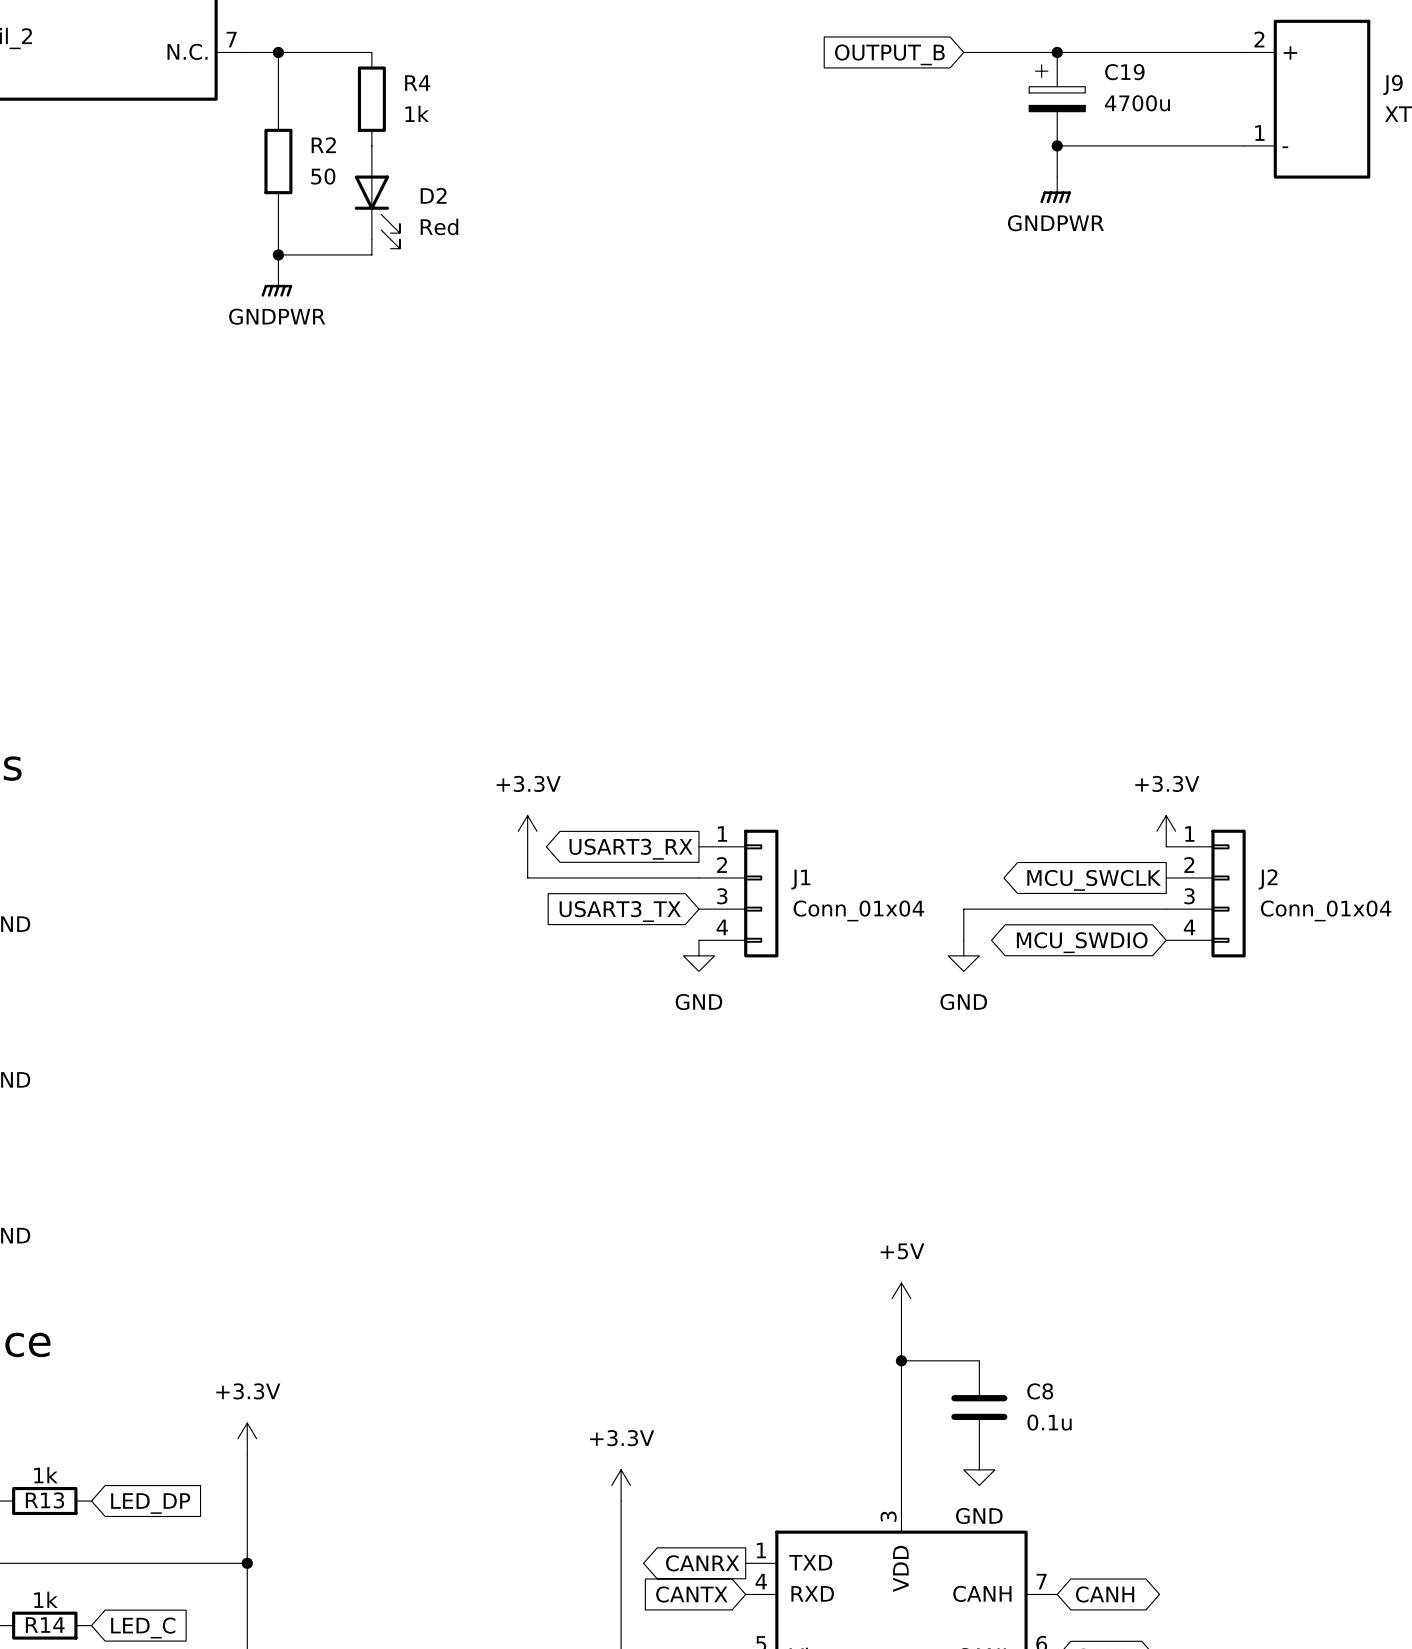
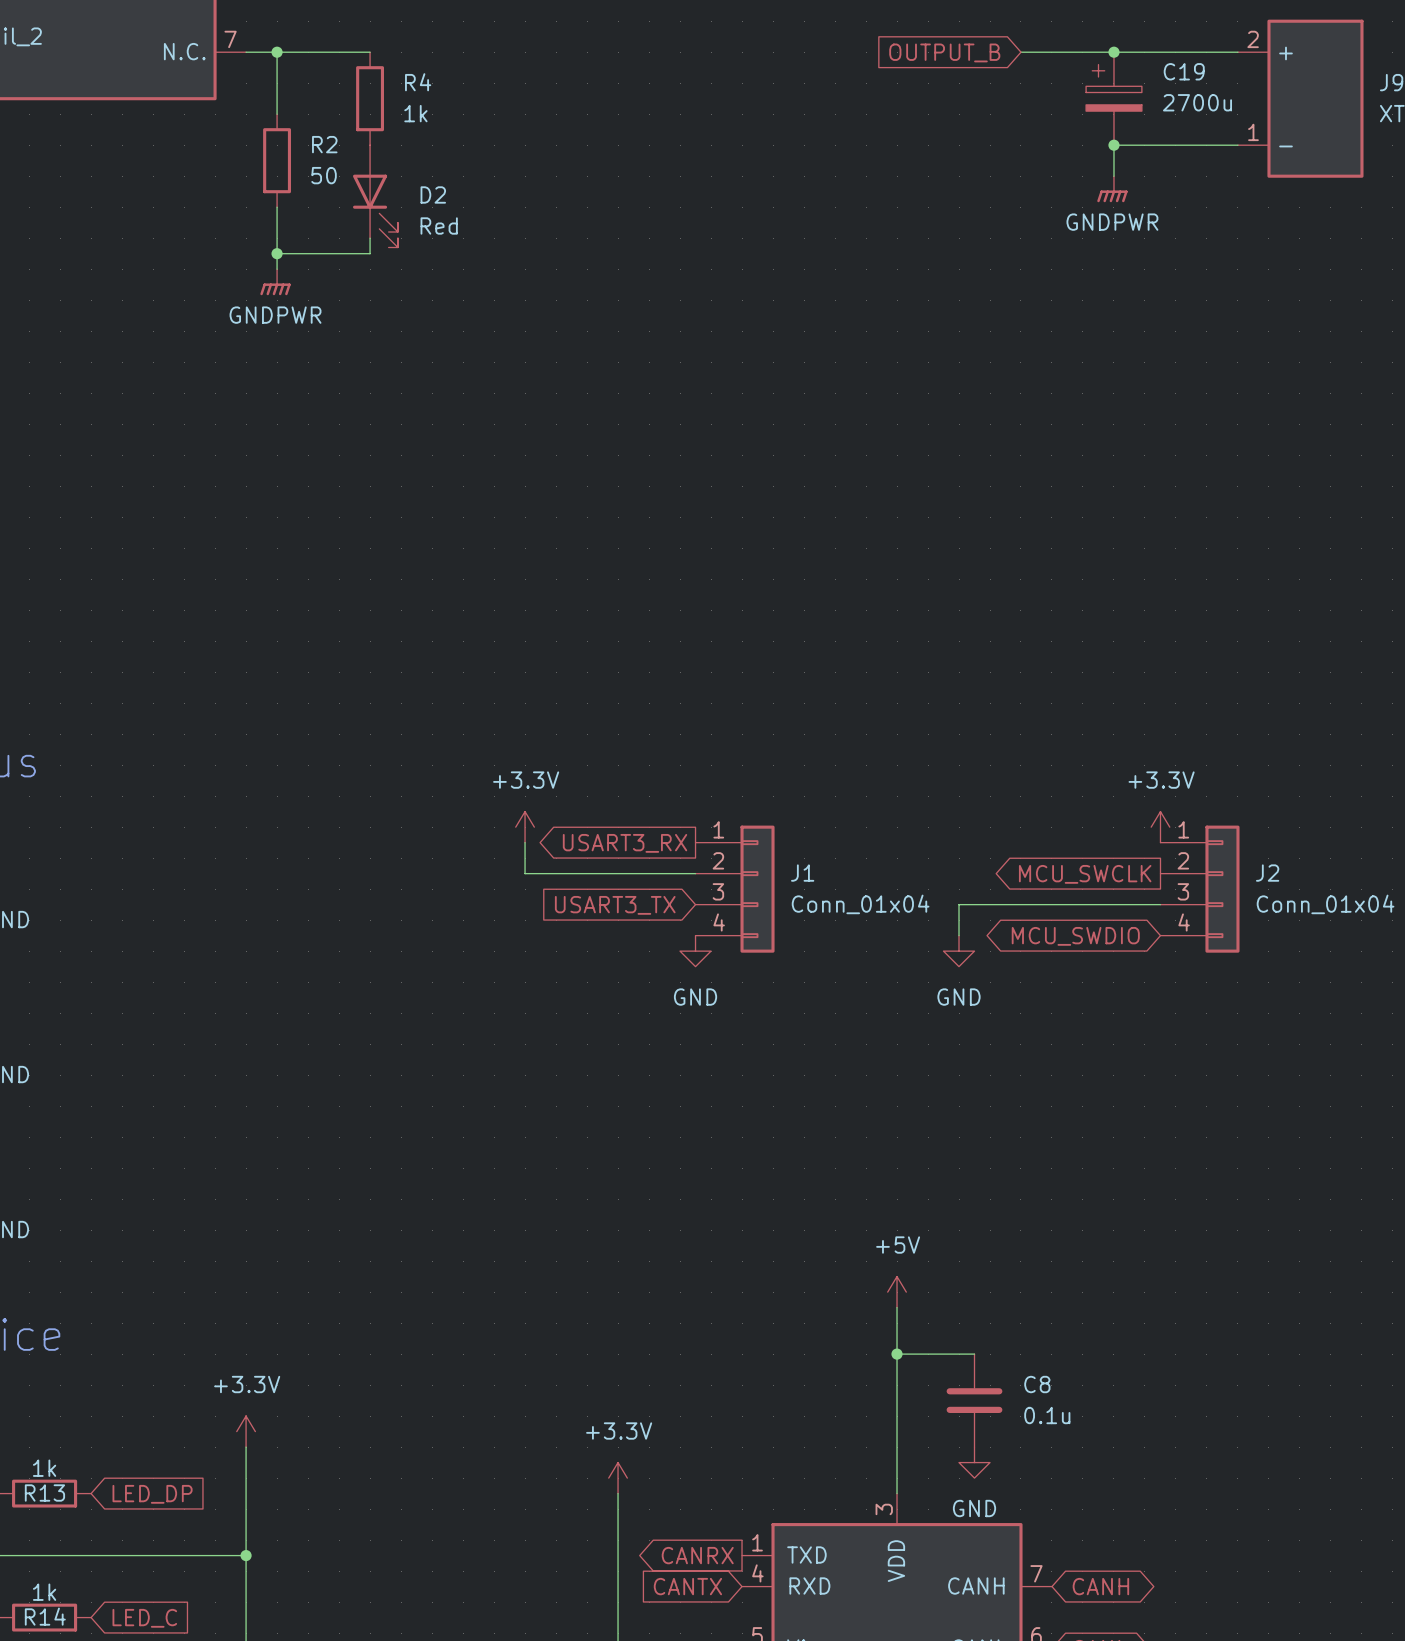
wire: (963, 52) (1026, 52) -> none
junction: (1057, 52) -> none
junction: none -> (1113, 52)
global label position: OUTPUT_B (889, 54) -> OUTPUT_B (944, 52)
C19 position: (1057, 99) -> (1113, 98)
C19 value: 4700u (1137, 103) -> 2700u (1197, 102)
junction: (1057, 145) -> none
wire: (1119, 145) (1057, 145) (1057, 177) -> (1113, 145) (1113, 176)
junction: none -> (1113, 145)
power symbol position: GNDPWR (1055, 190) -> GNDPWR (1112, 189)

